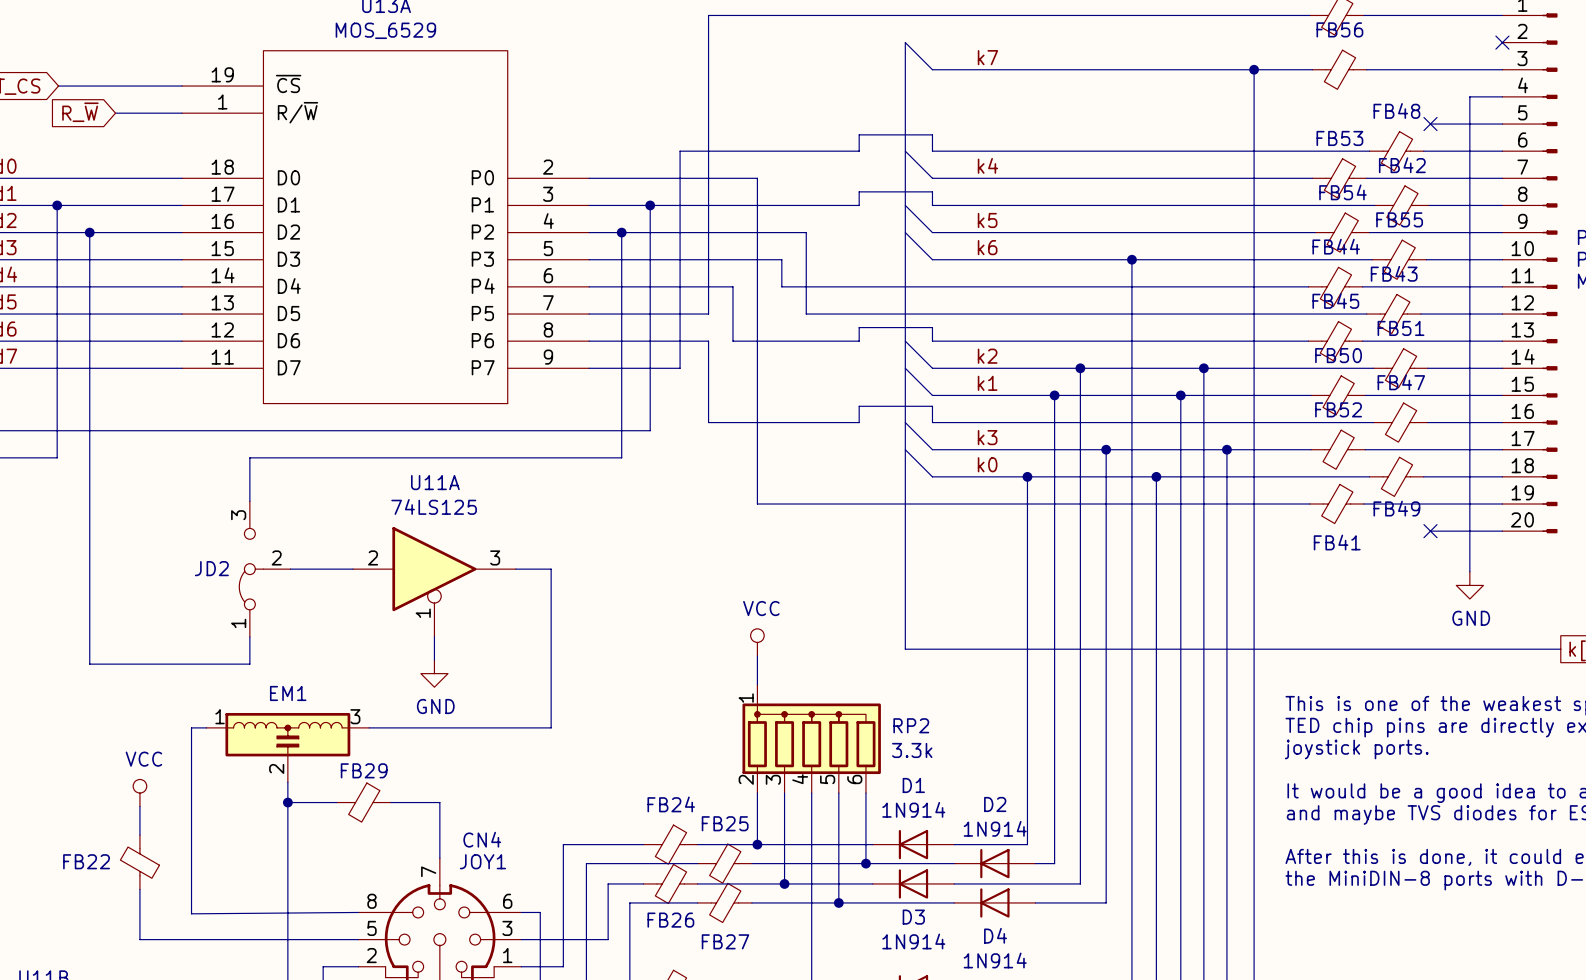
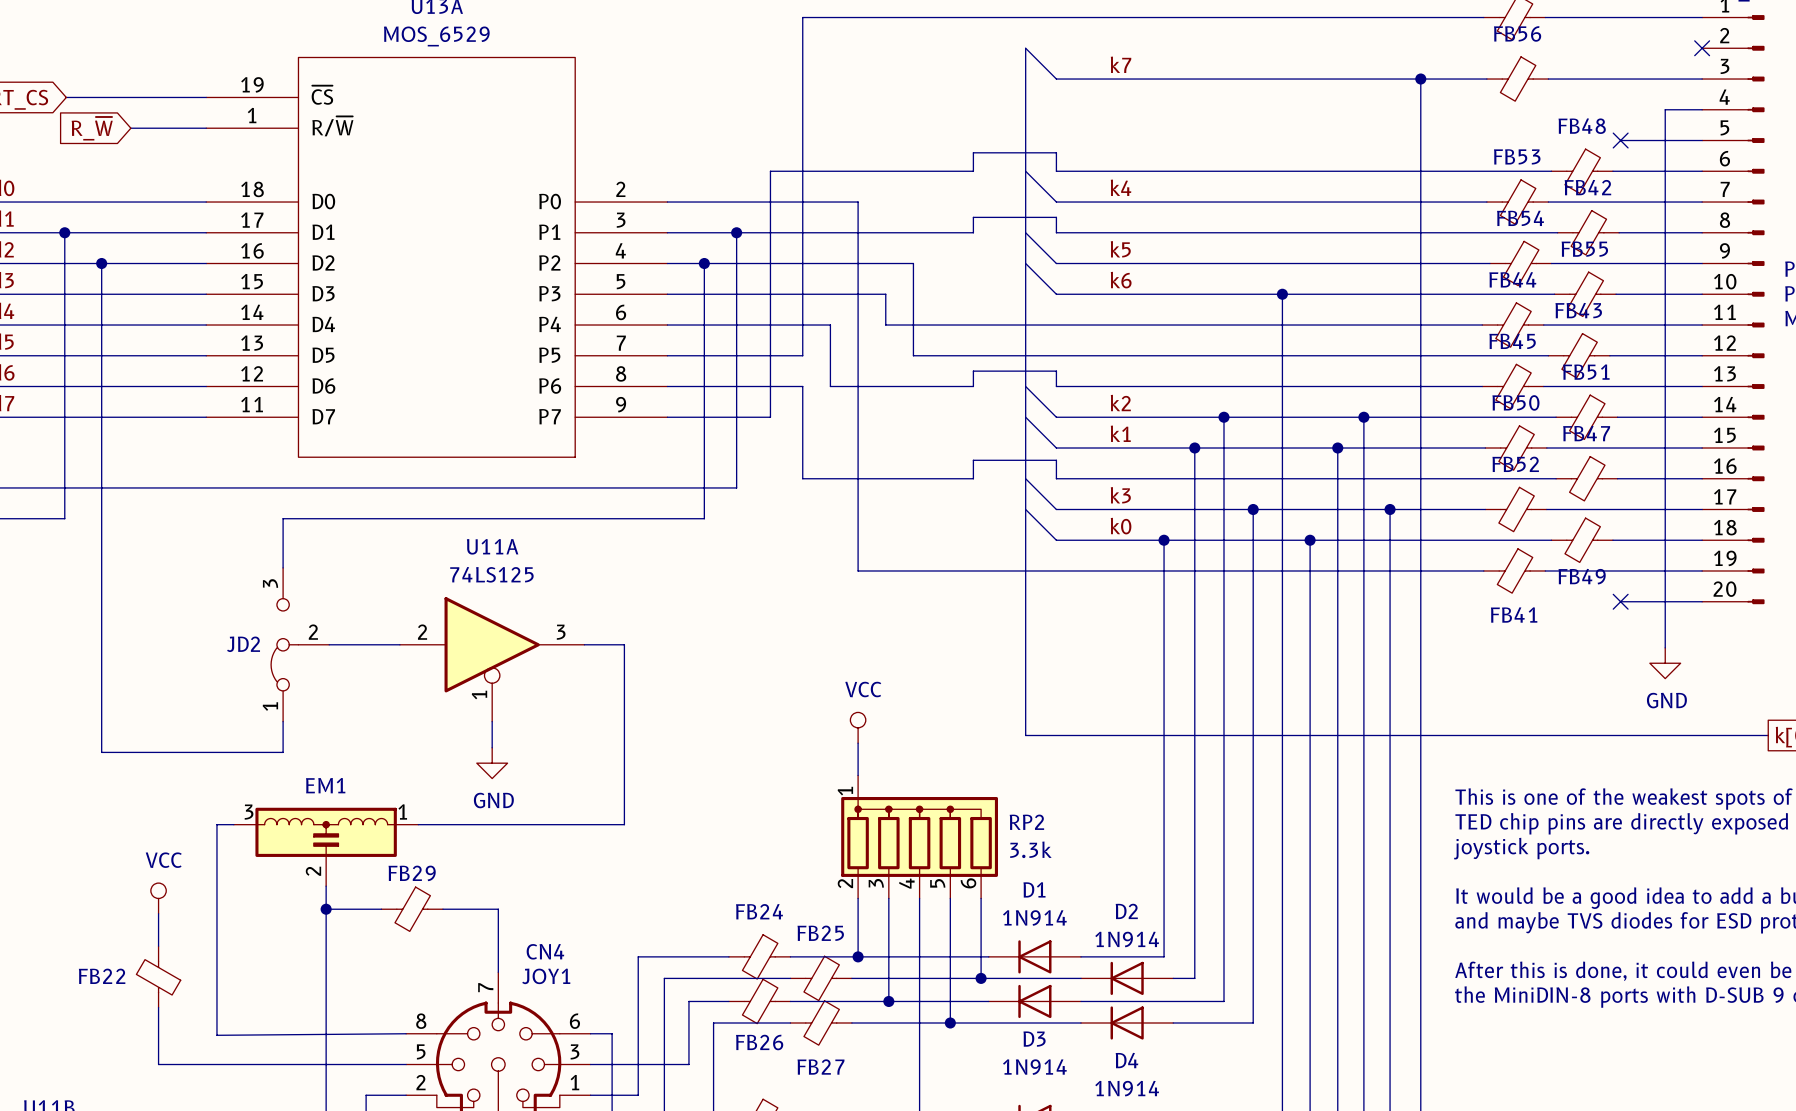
EM1 flip: as is (287, 734) -> left-right (326, 832)

